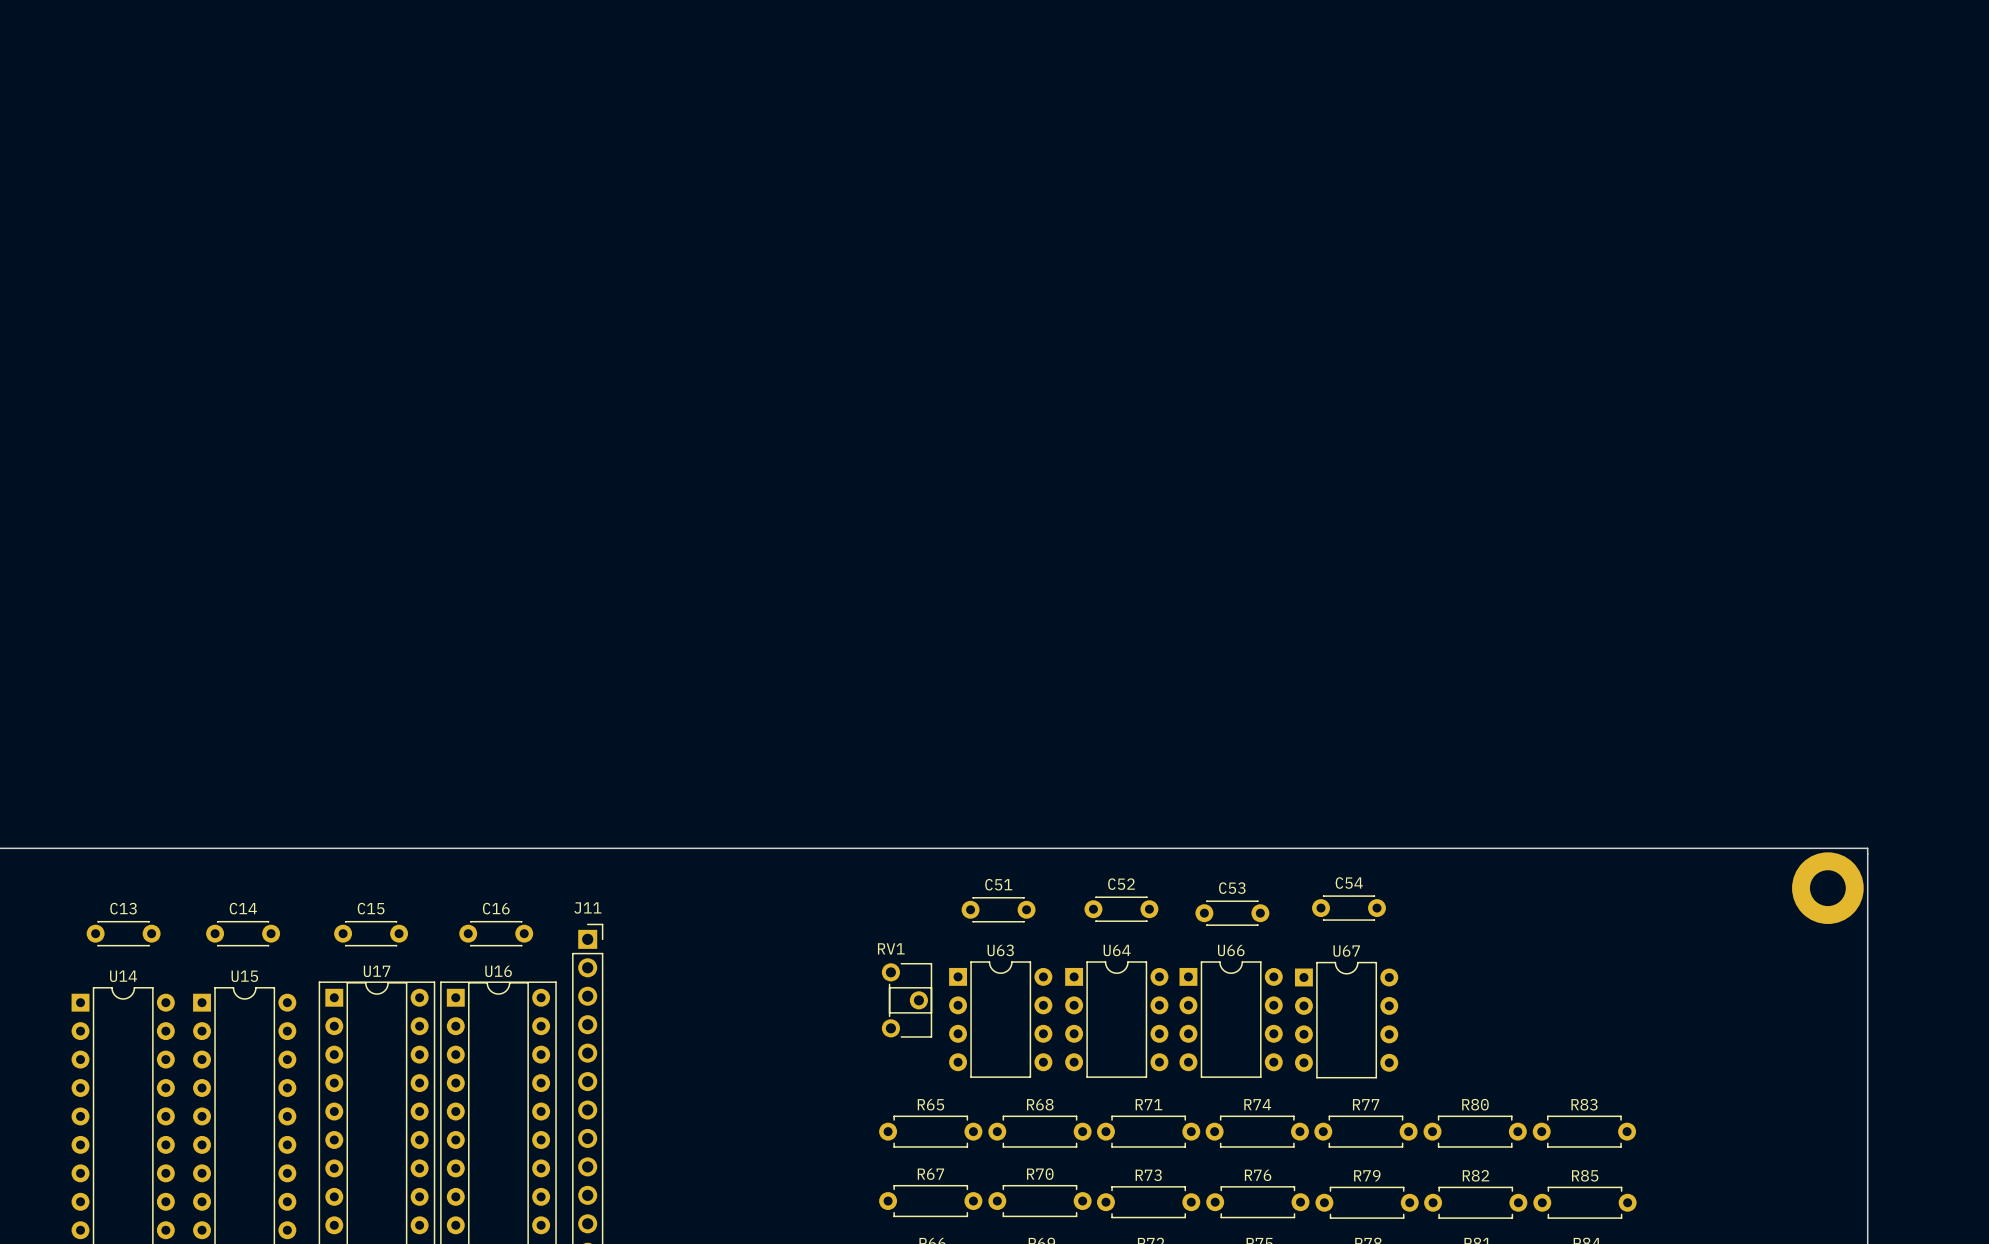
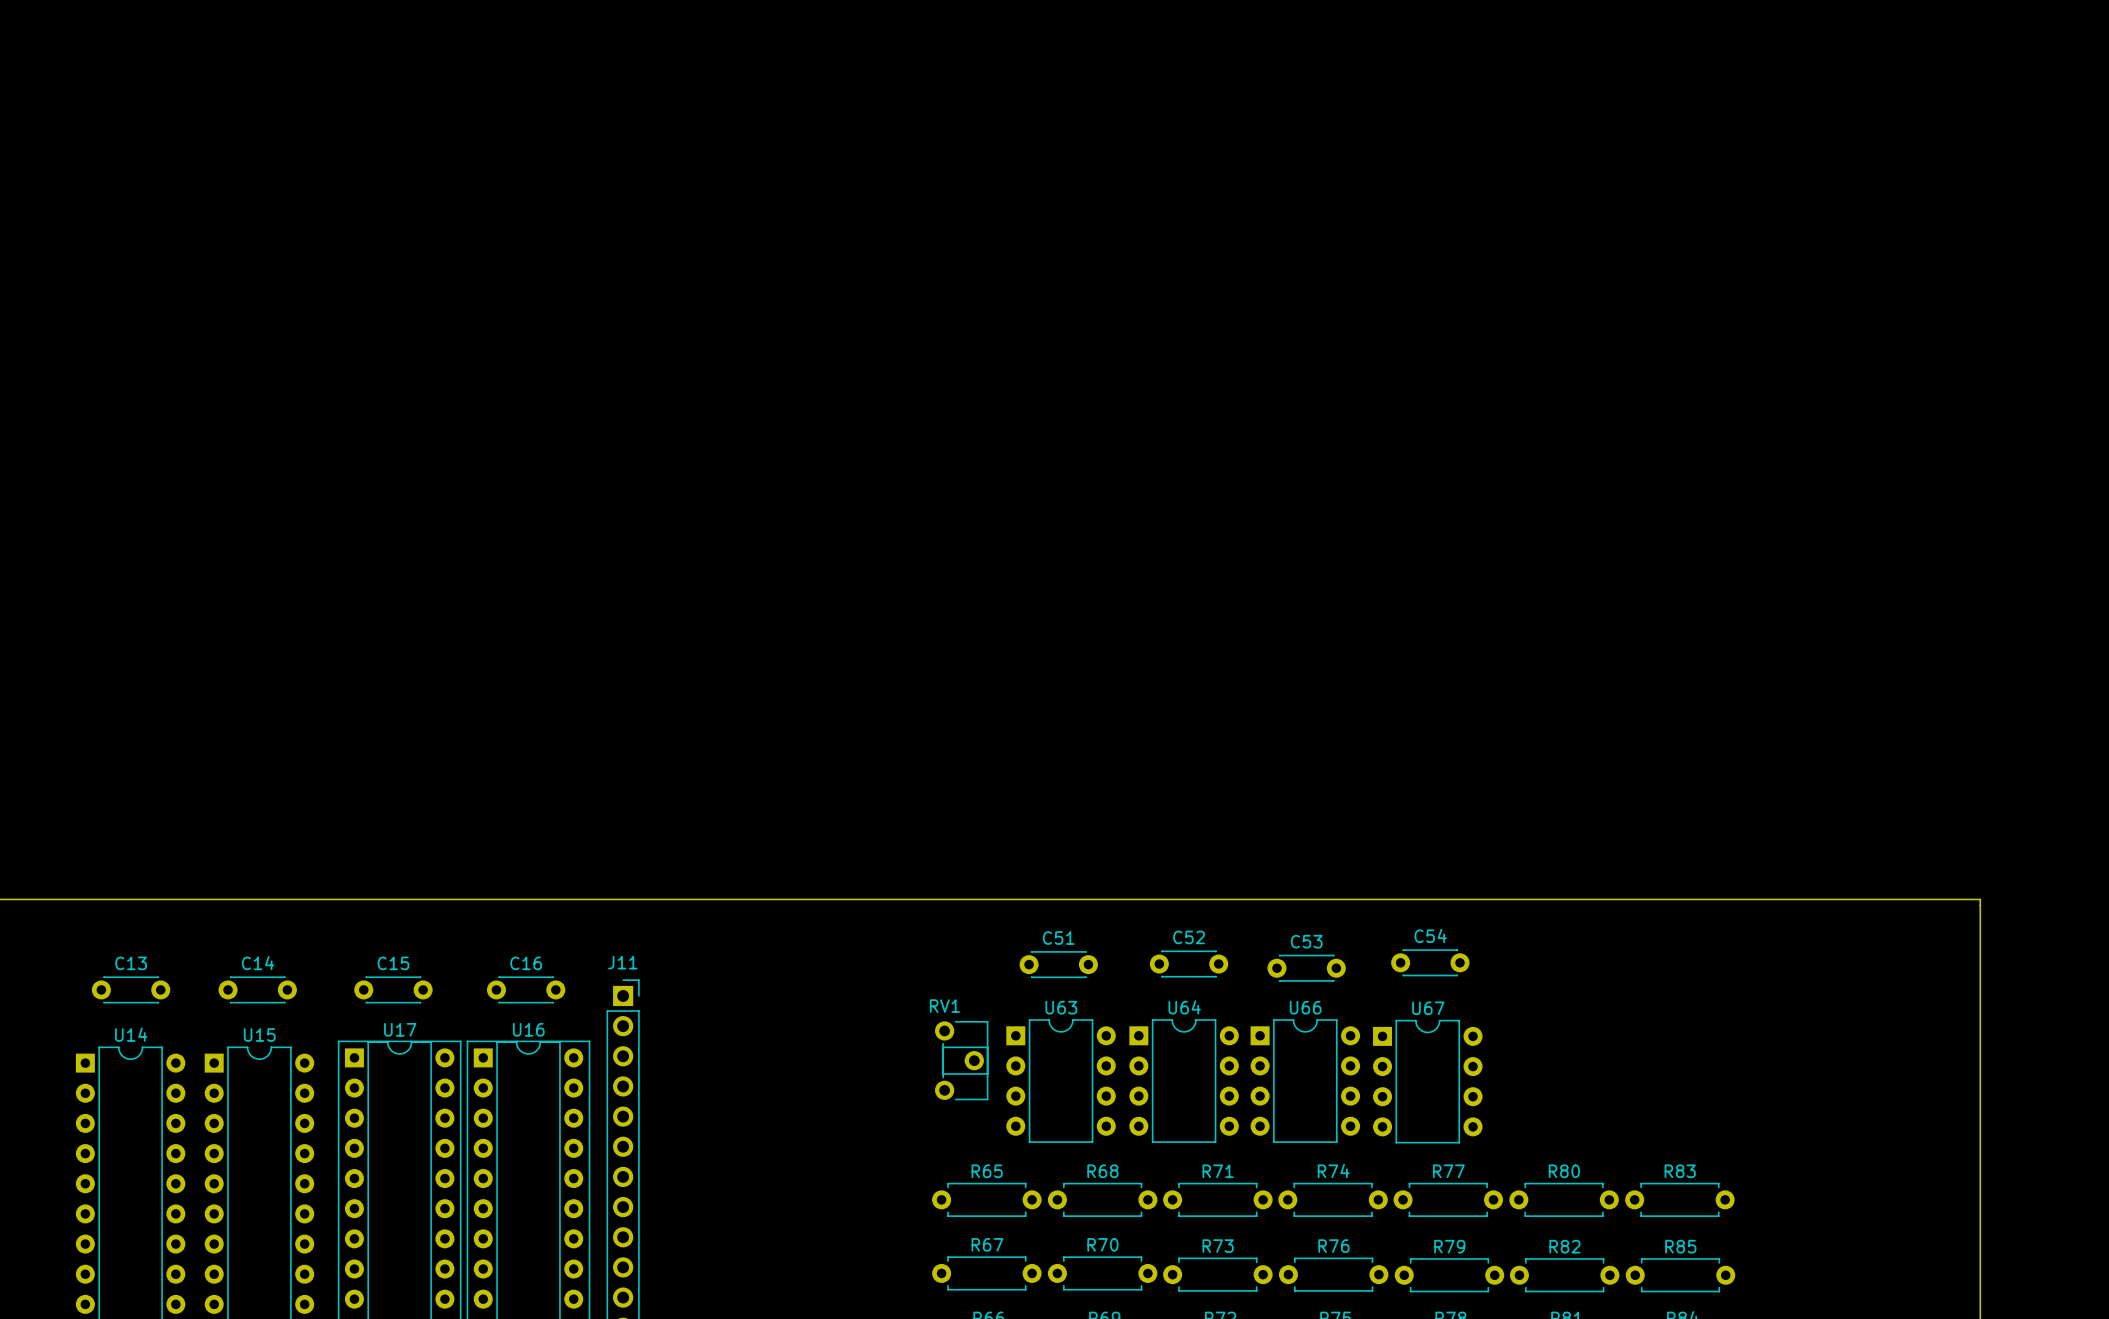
part: (1827, 888) -> none

